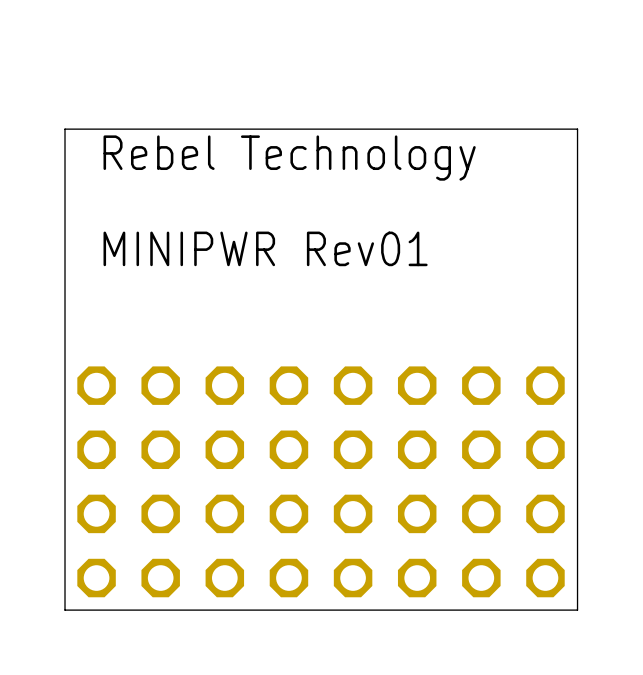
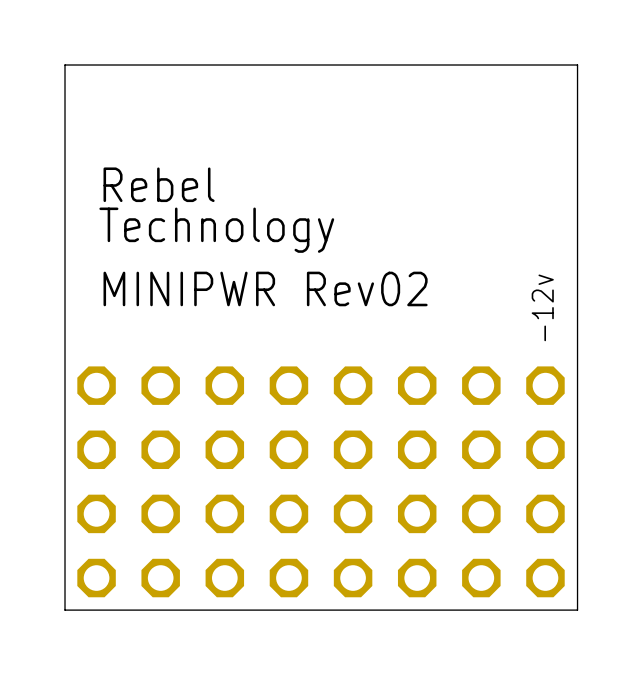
board edge: (577, 129) (65, 129) -> (577, 129) (577, 65) (65, 65) (65, 129)
text: Rebel Technology (289, 158) -> none
text: none -> Rebel (159, 184)
text: none -> Technology (216, 230)
text: MINIPWR Rev01 (265, 248) -> MINIPWR Rev02 (265, 288)
text: none -> -12v (542, 307)

